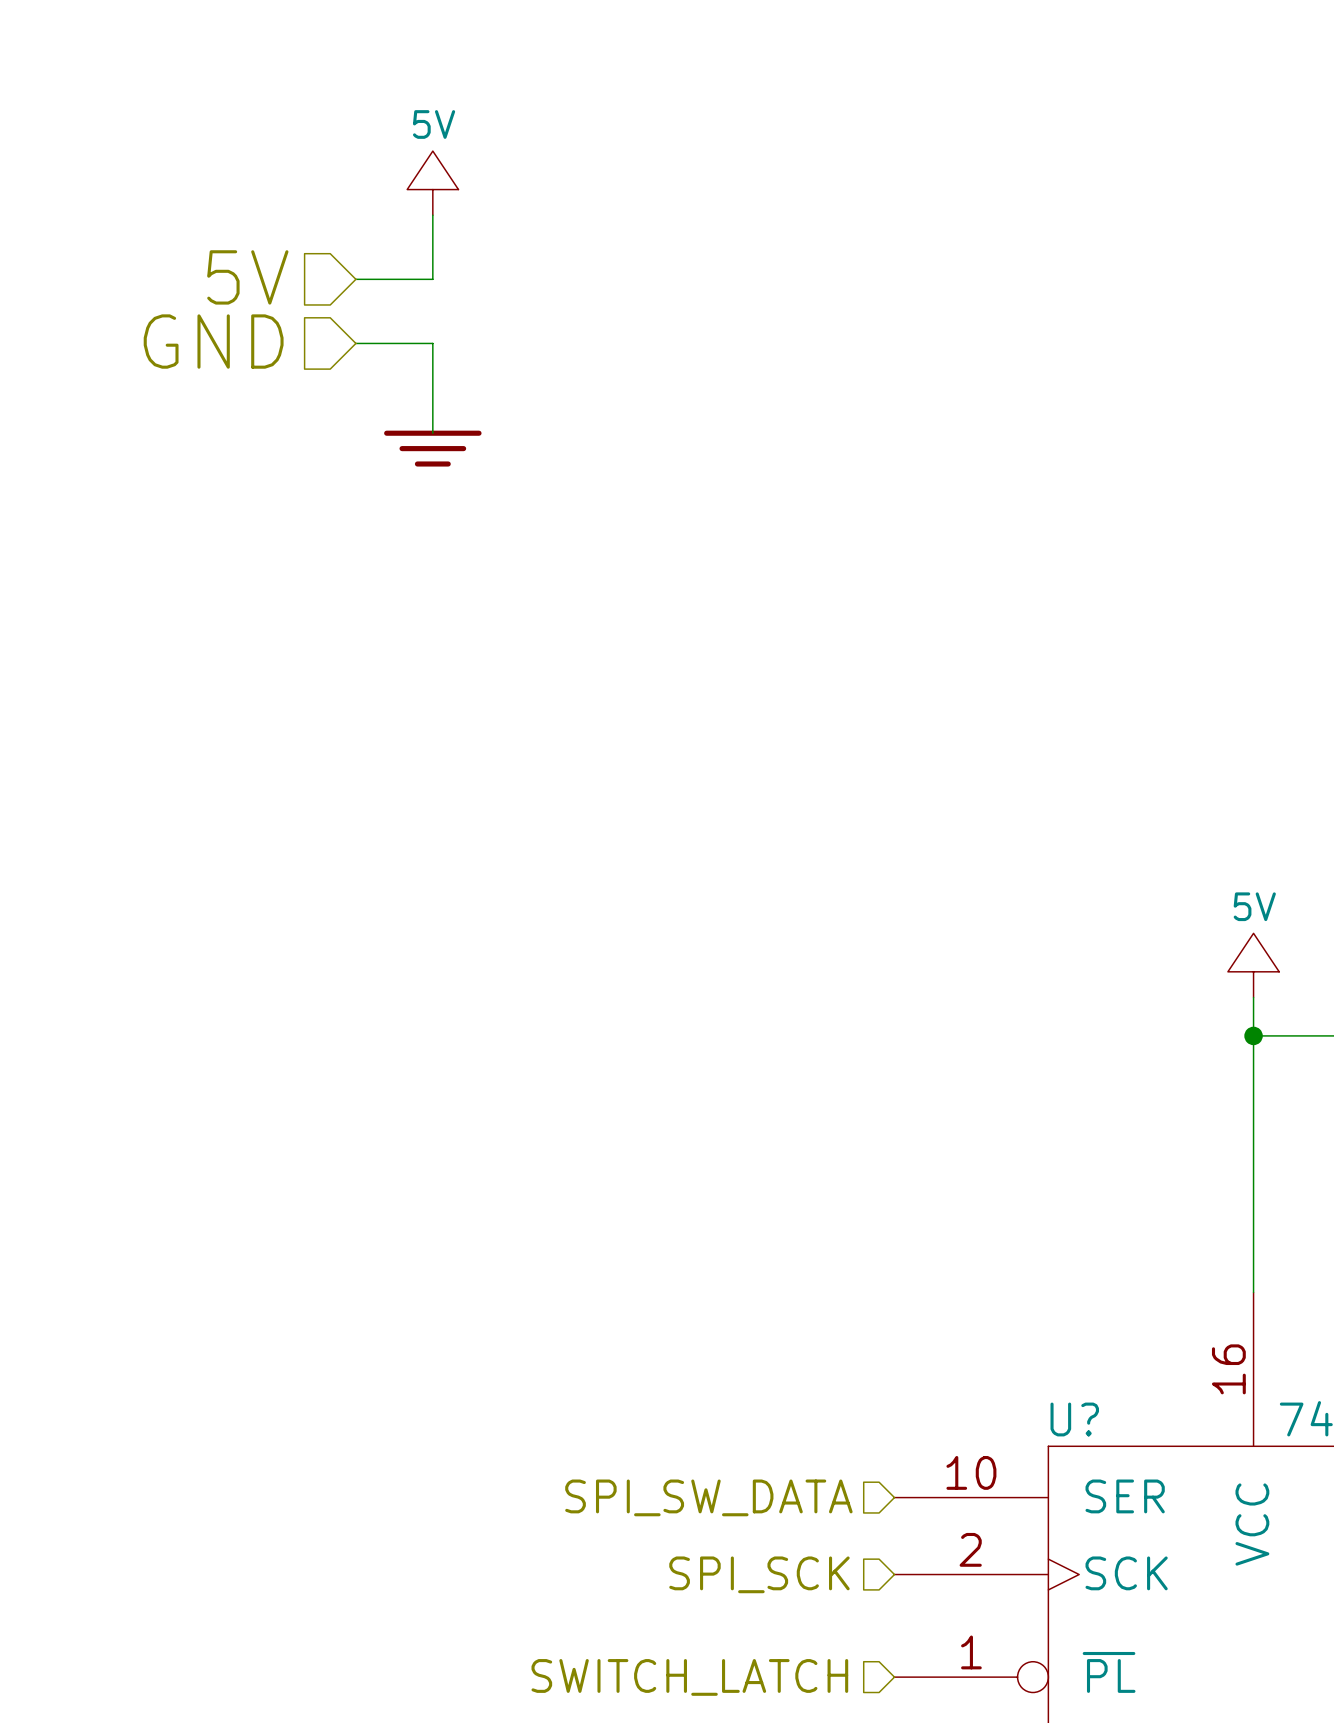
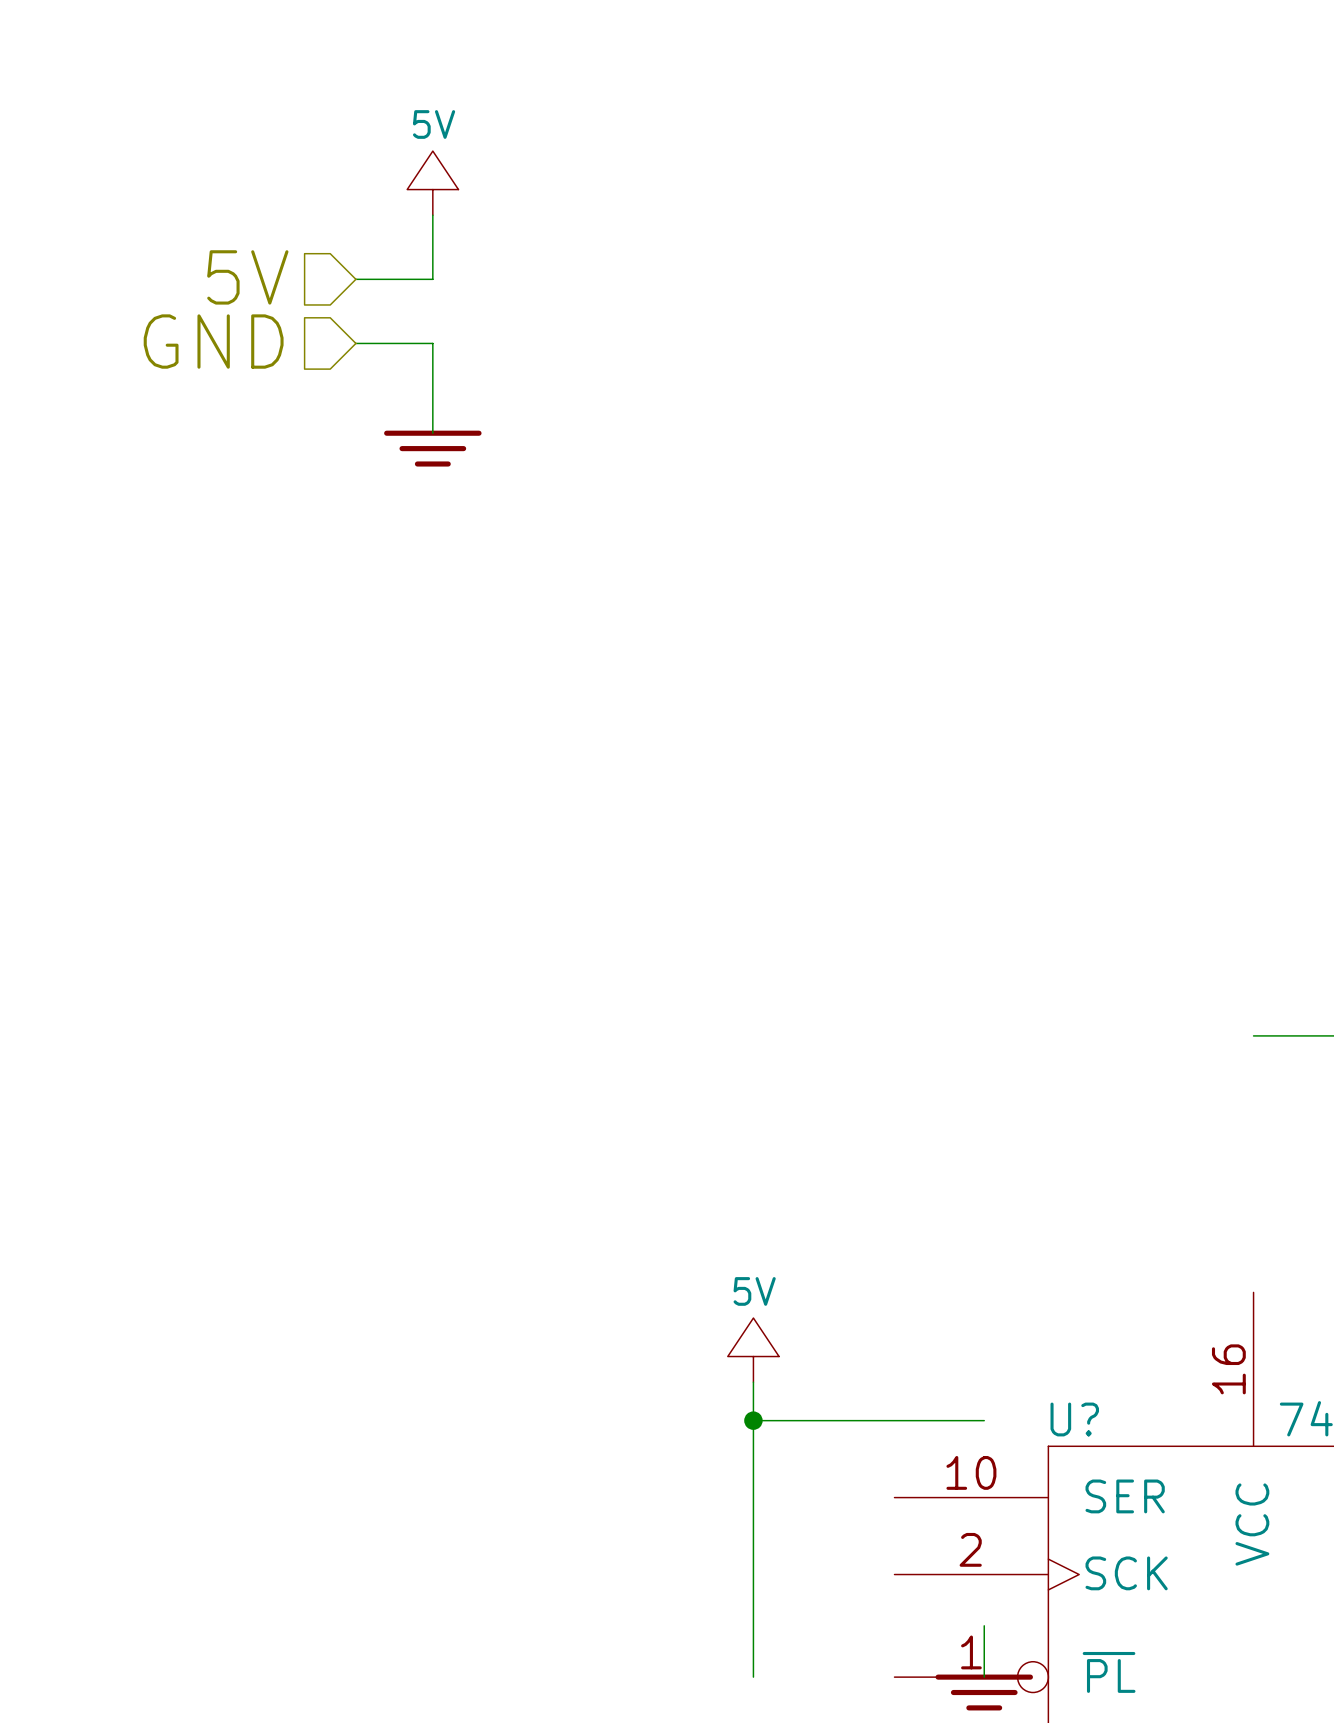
power symbol: 5V (1253, 965) -> none
wire: (1253, 997) (1253, 1292) -> none
junction: (1253, 1035) -> none
power symbol: none -> 5V (753, 1350)
wire: none -> (753, 1382) (753, 1677)
wire: none -> (753, 1420) (984, 1420)
junction: none -> (753, 1420)
hierarchical label: SPI_SW_DATA (708, 1497) -> none
hierarchical label: SPI_SCK (759, 1574) -> none
wire: none -> (984, 1625) (984, 1677)
hierarchical label: SWITCH_LATCH (689, 1677) -> none
power symbol: none -> (984, 1692)

